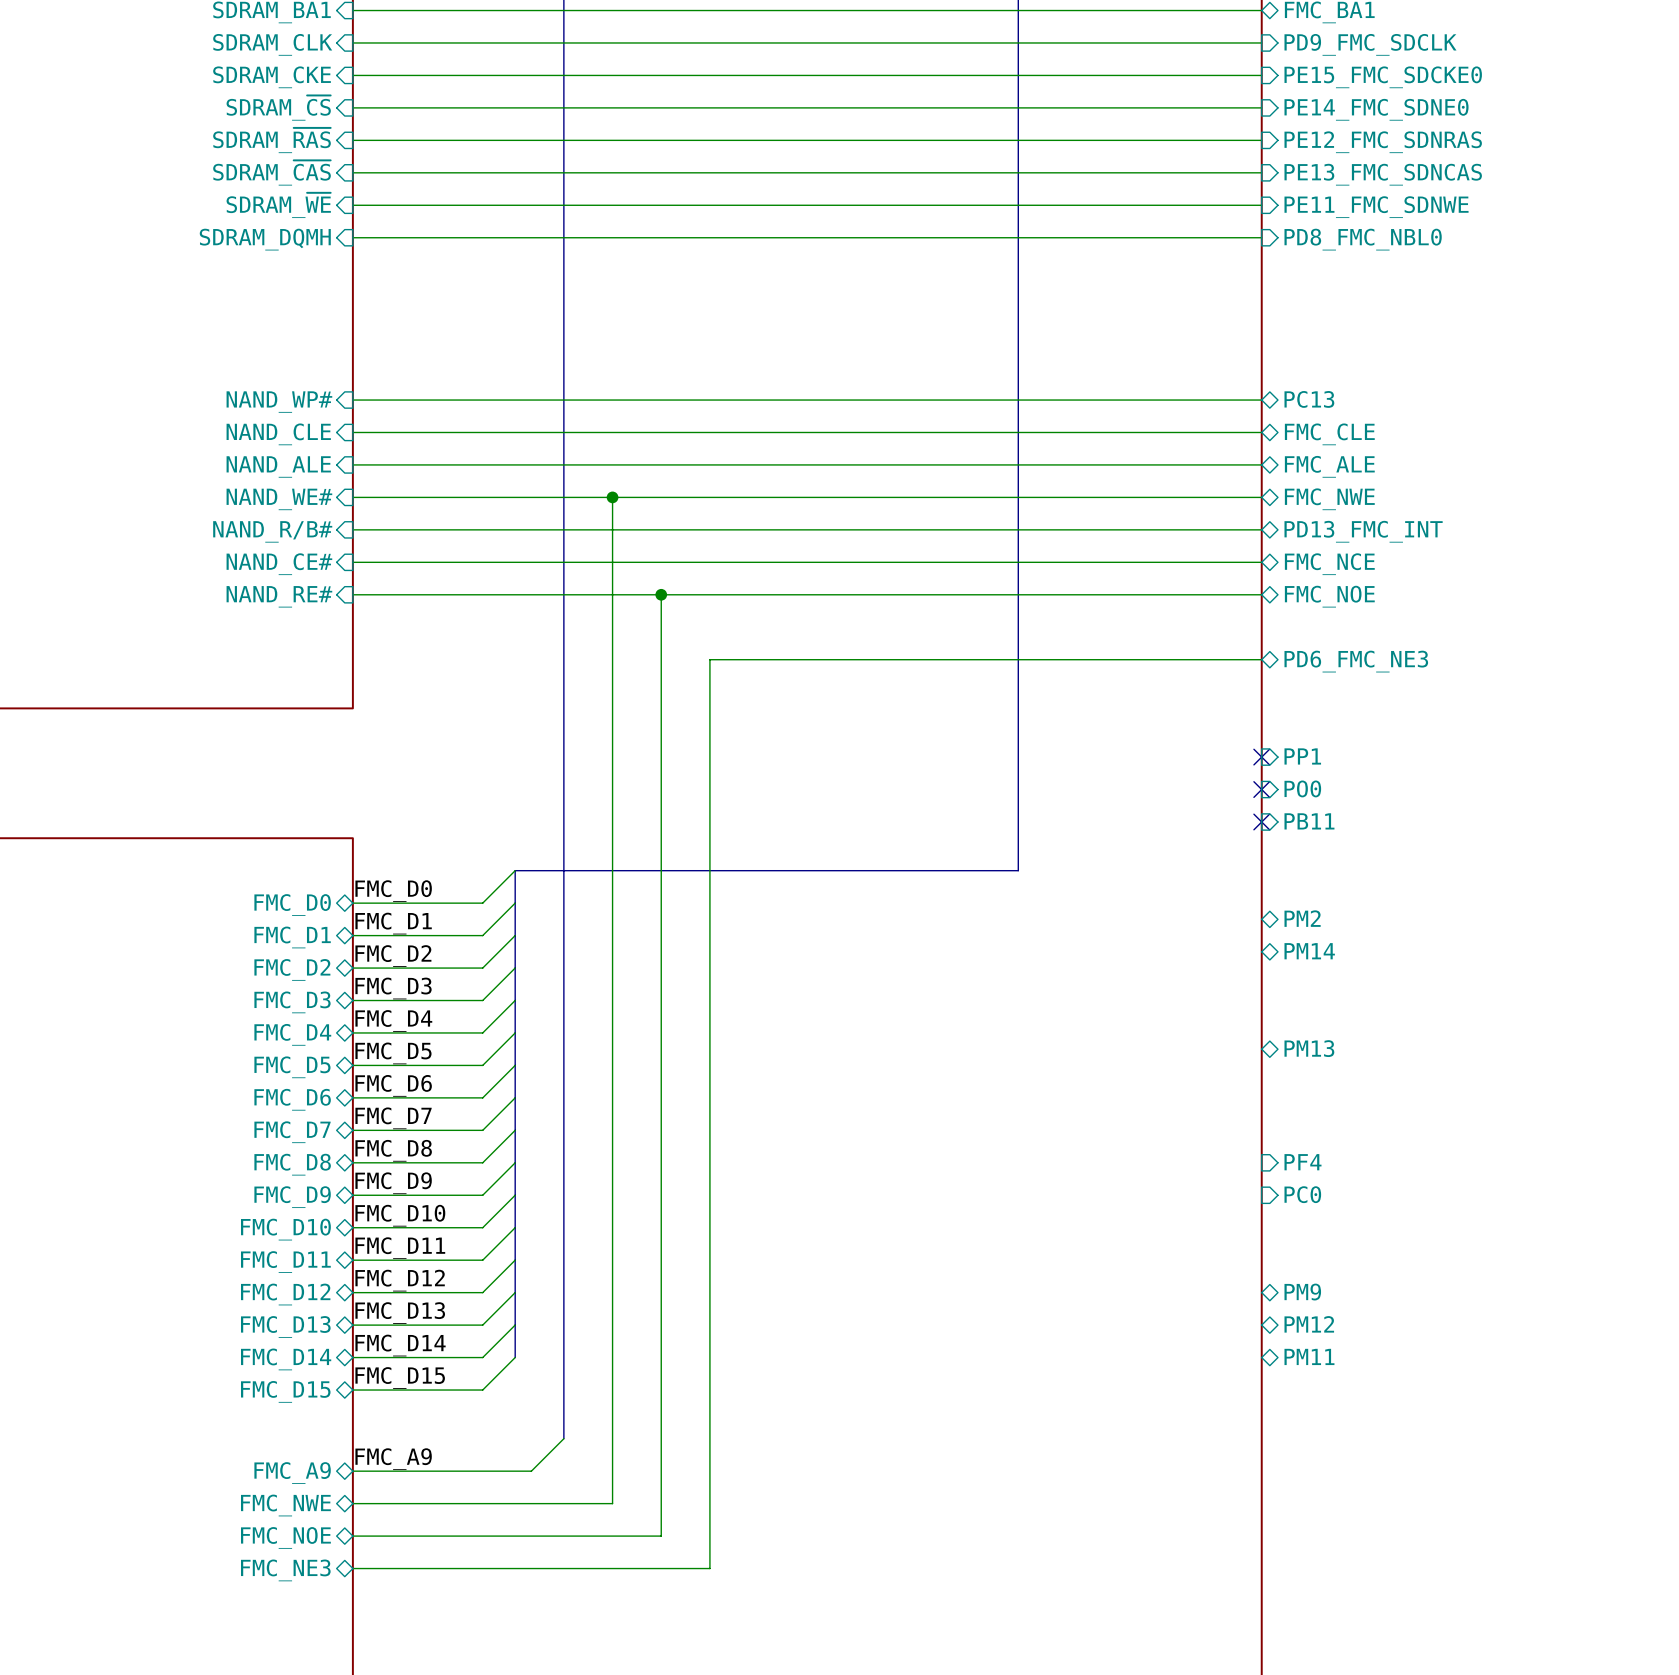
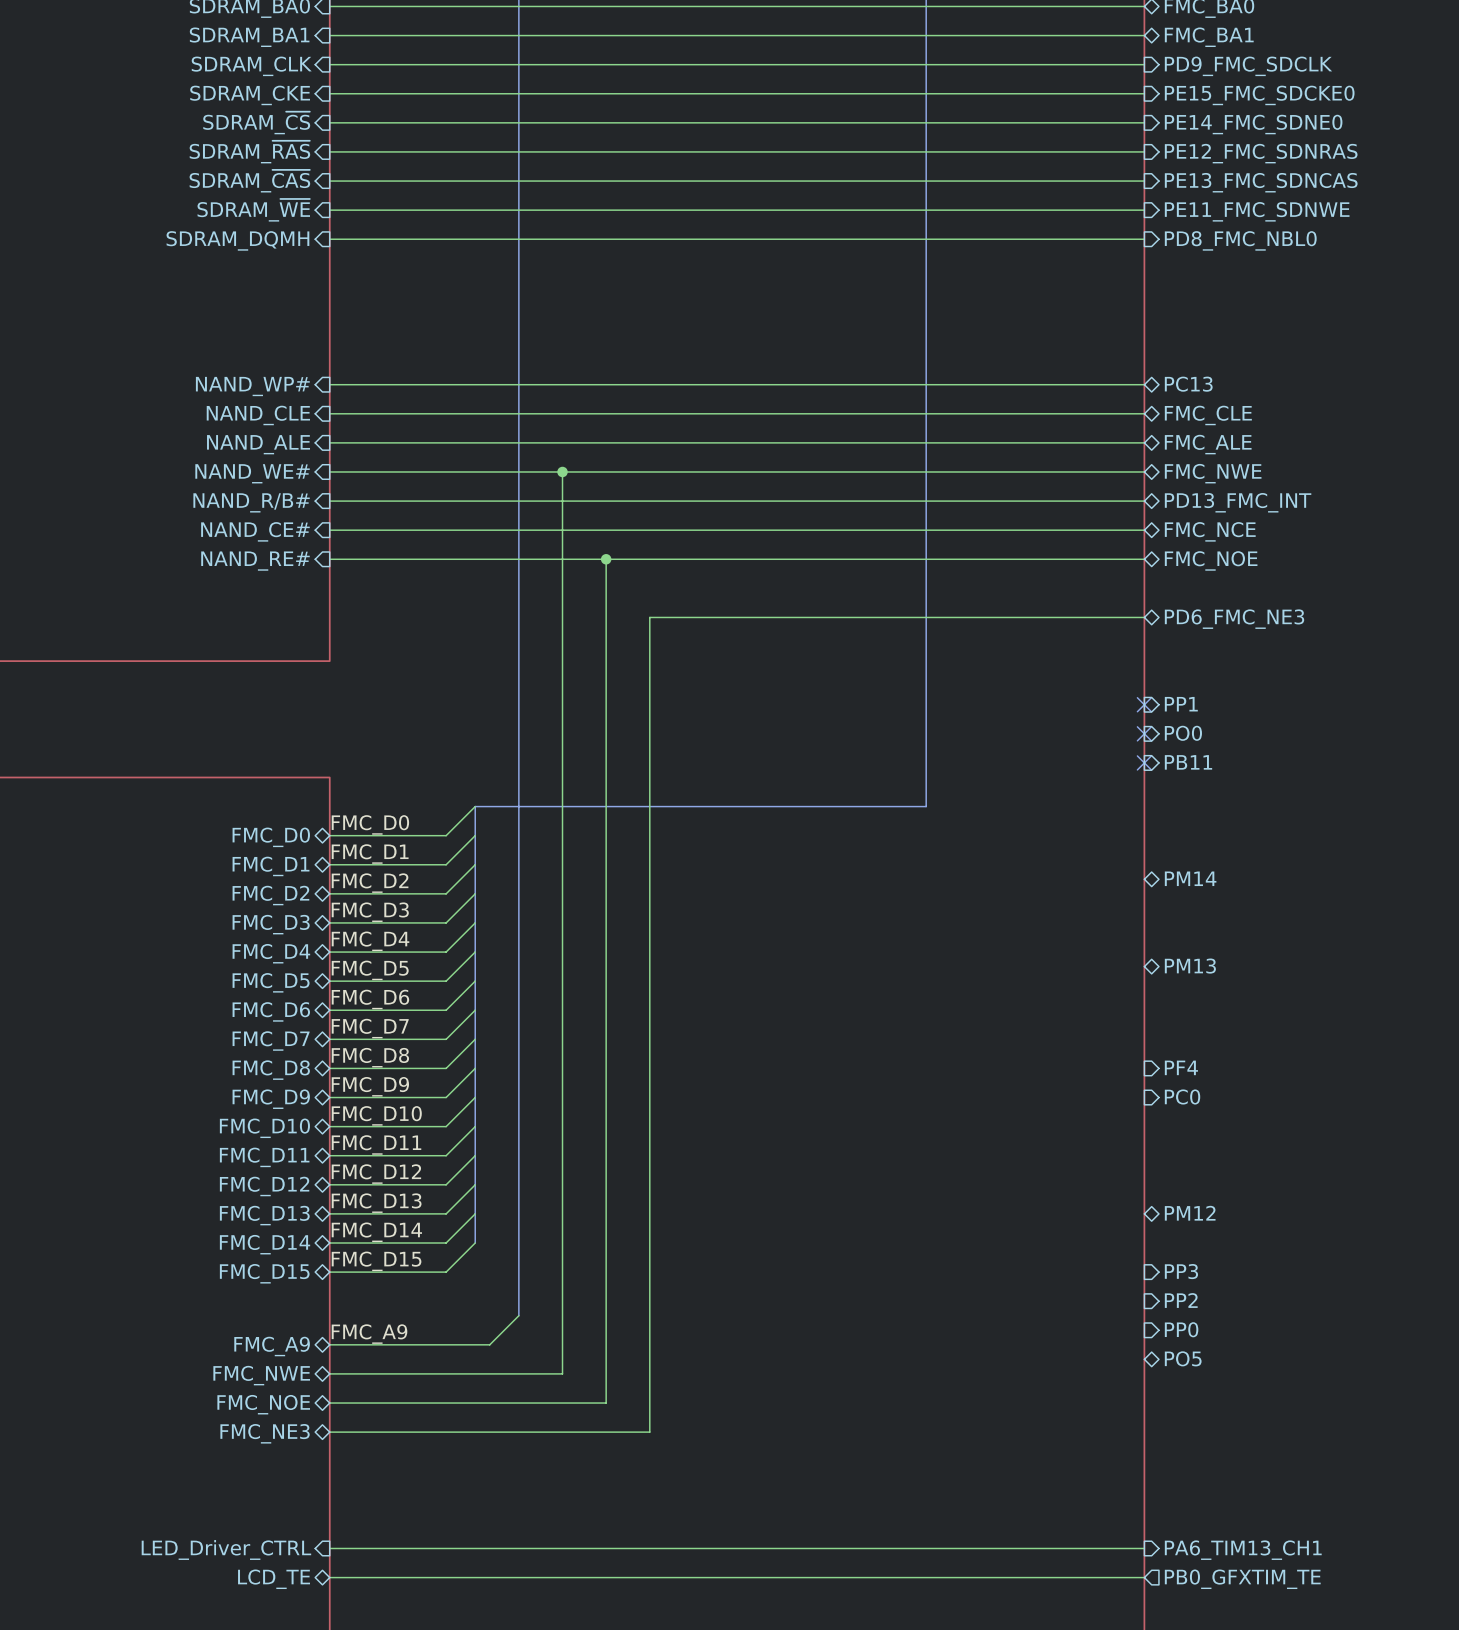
sheet pin: PM2 (1302, 918) -> none
sheet pin: PM9 (1302, 1292) -> none
sheet pin: PM11 (1309, 1356) -> none
sheet pin: none -> PP3 (1181, 1271)
sheet pin: none -> PP2 (1181, 1300)
sheet pin: none -> PP0 (1181, 1329)
sheet pin: none -> PO5 (1183, 1358)

